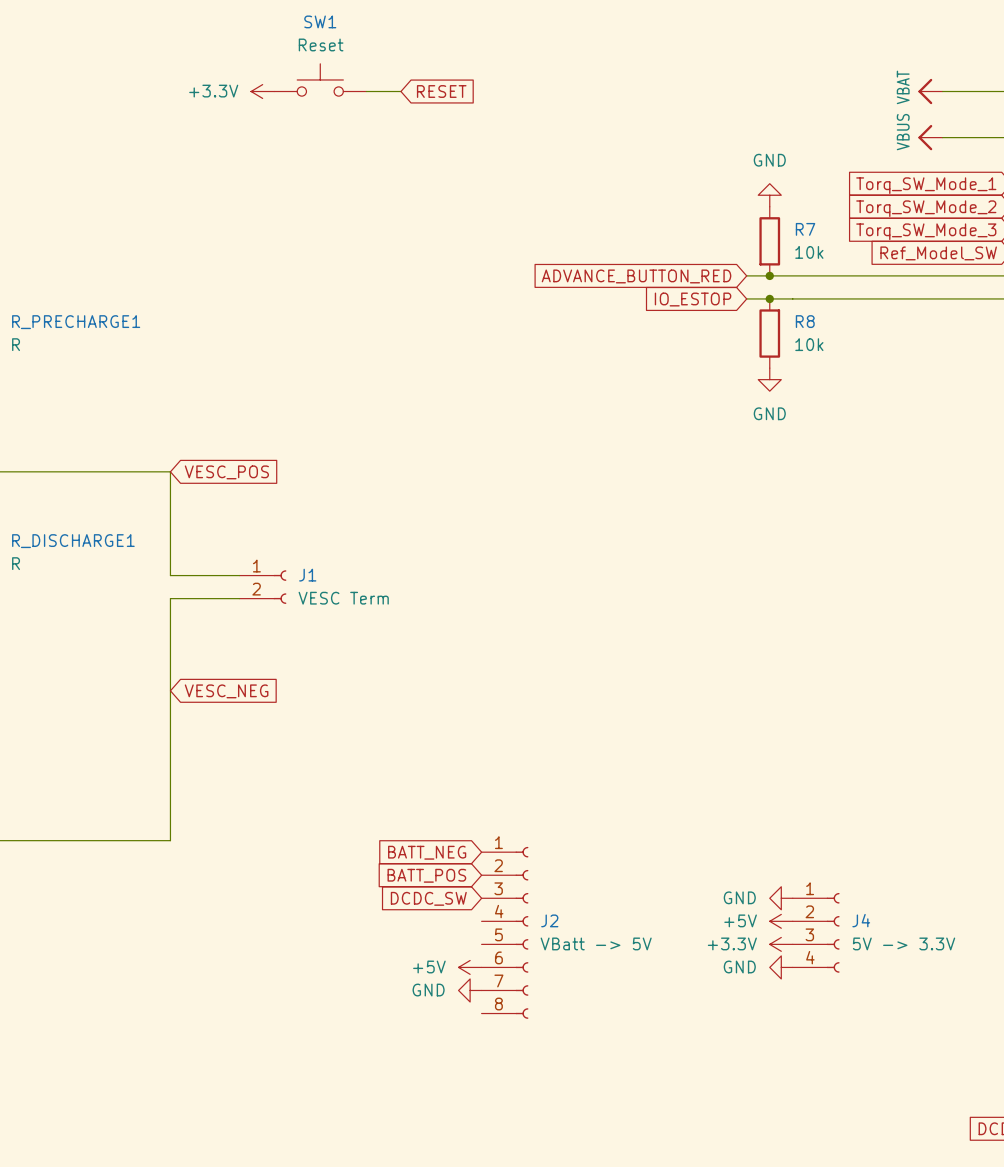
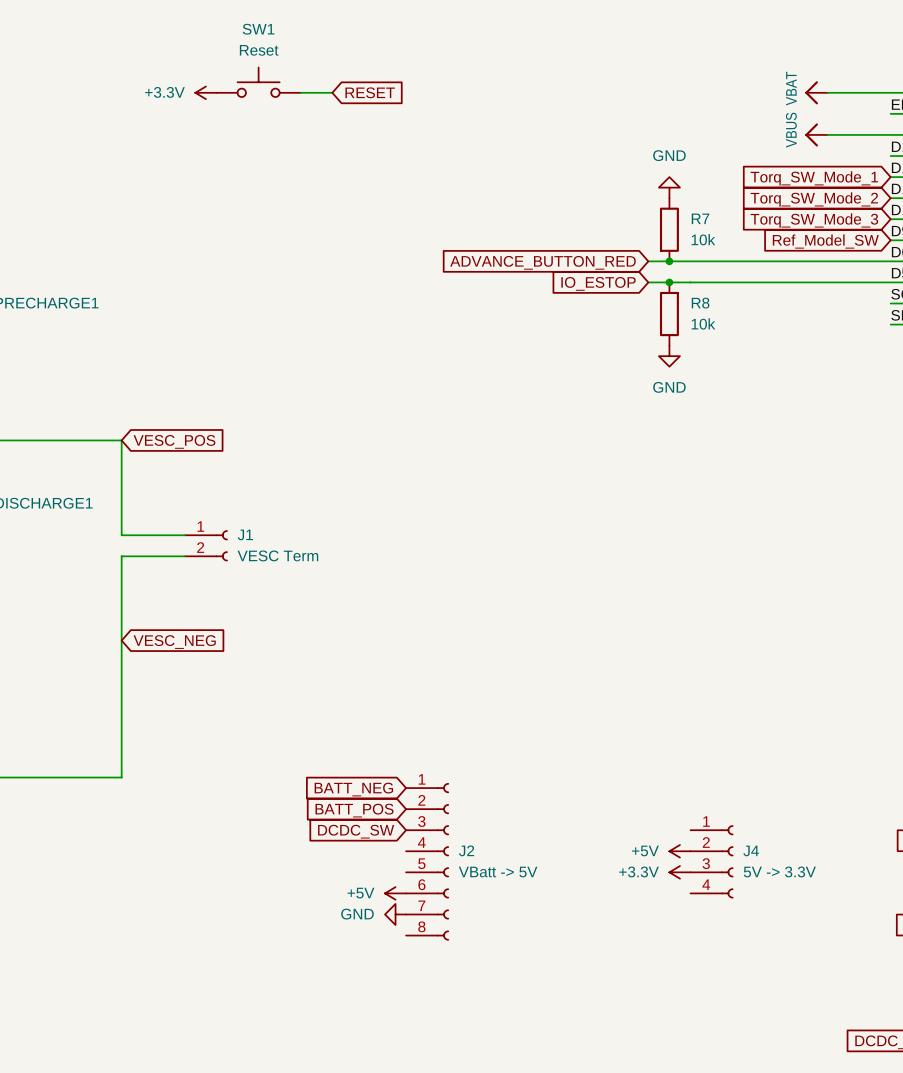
power symbol: GND (781, 898) -> none
power symbol: GND (781, 967) -> none

